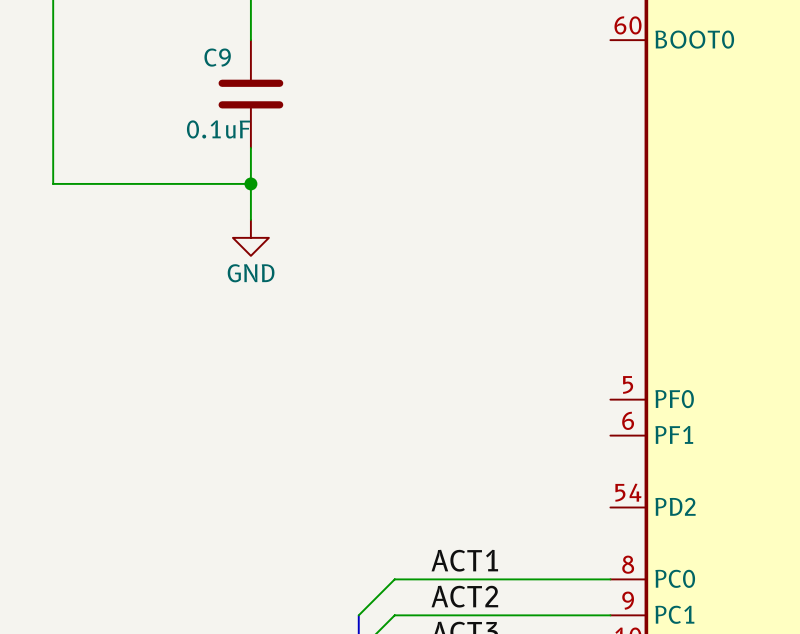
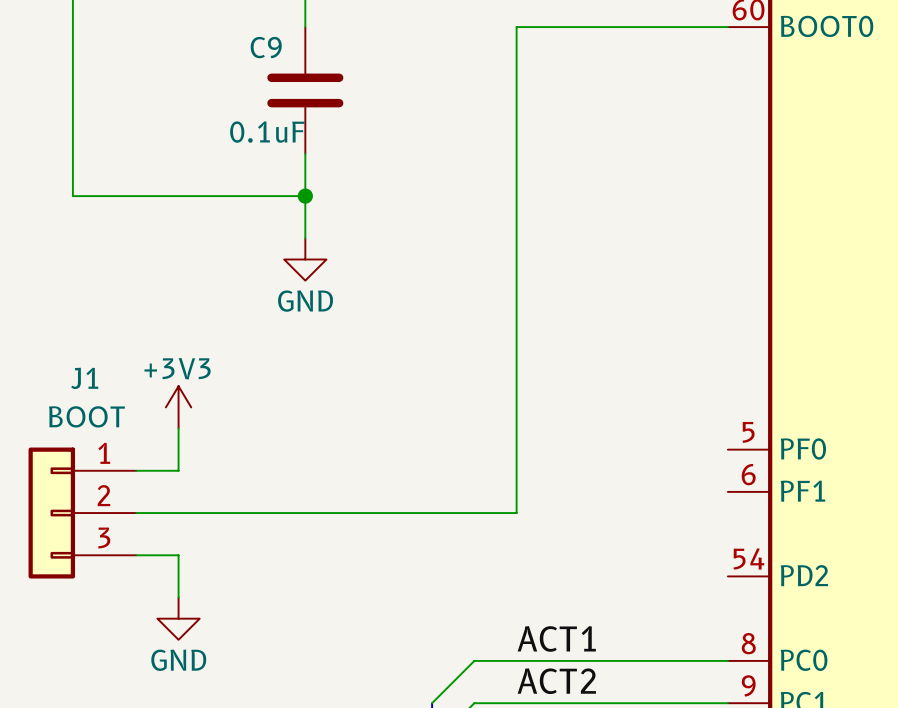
wire: none -> (727, 27) (516, 27) (516, 513) (136, 513)
power symbol: none -> +3V3 (178, 407)
wire: none -> (178, 428) (178, 470) (136, 470)
J1: none -> BOOT (82, 513)
wire: none -> (136, 555) (178, 555) (178, 597)
power symbol: none -> GND (178, 618)

